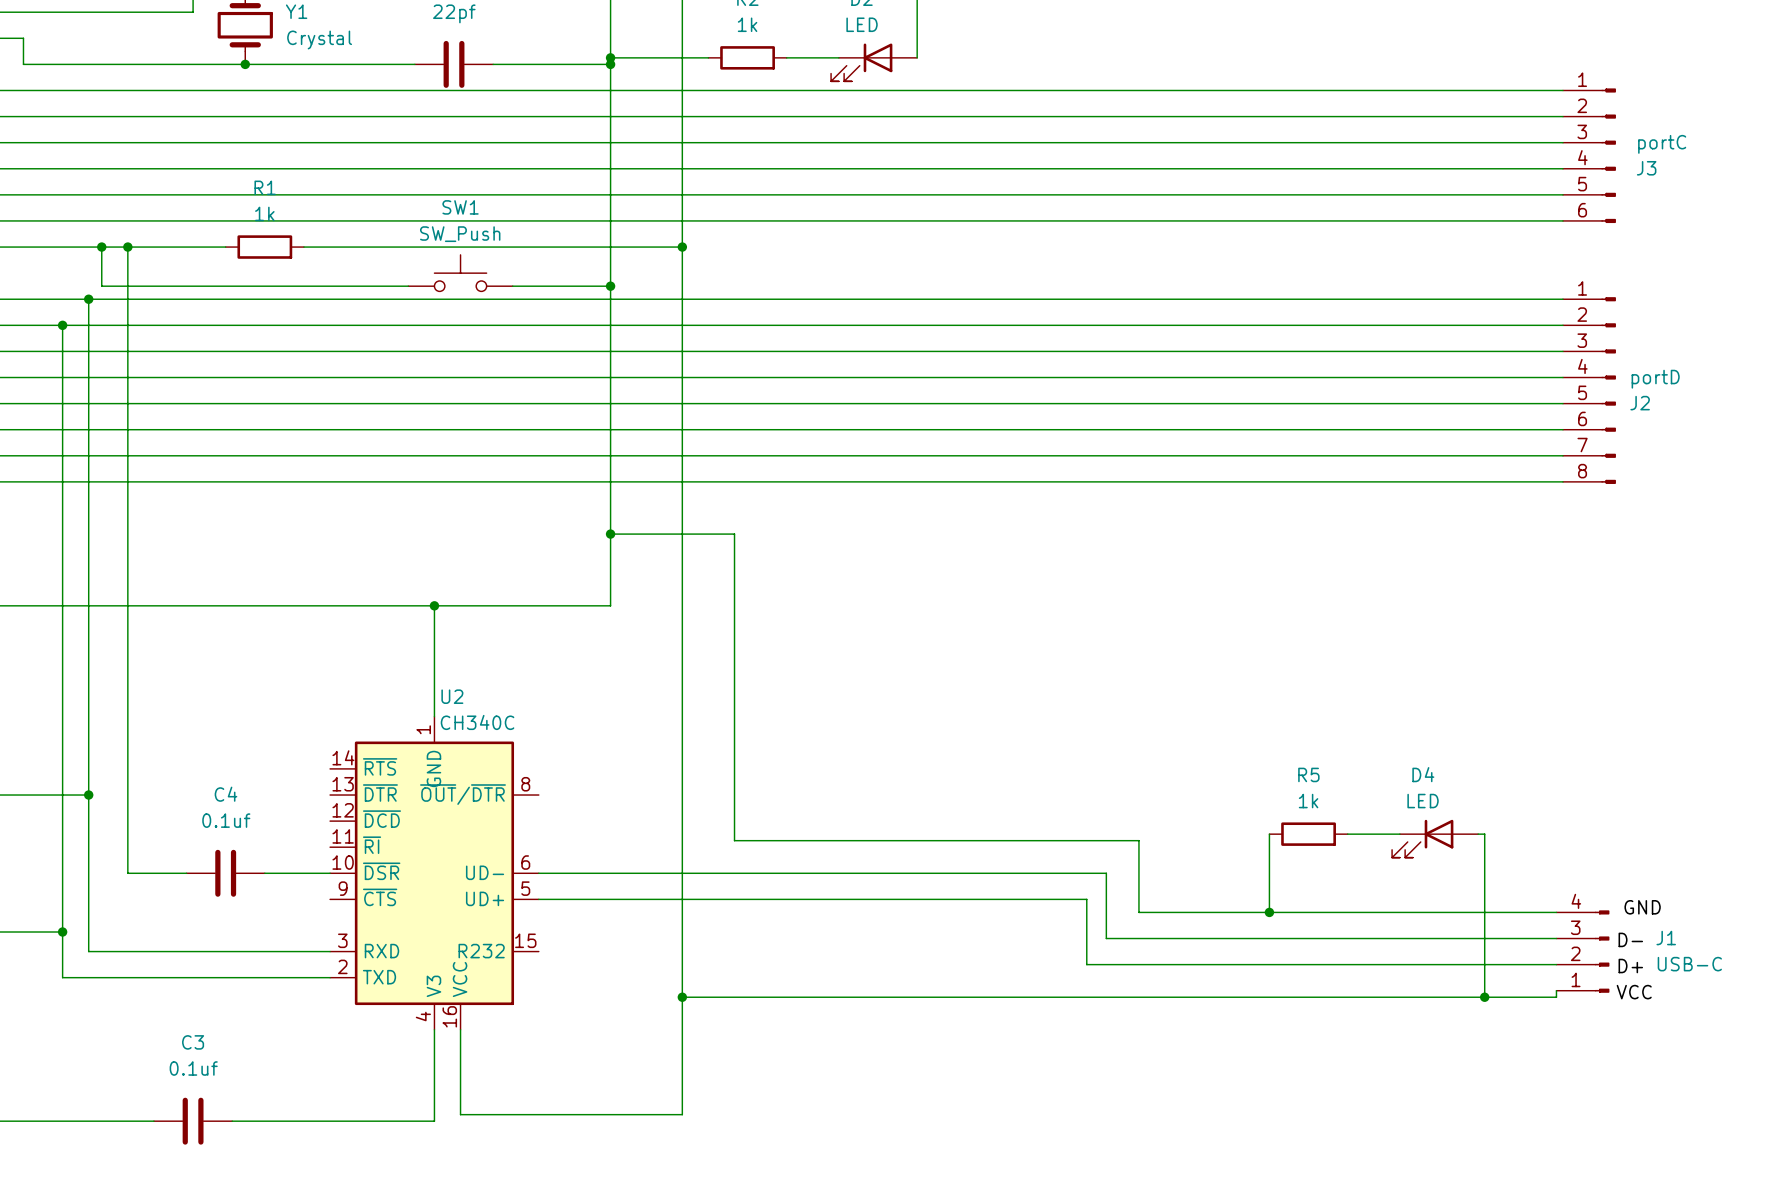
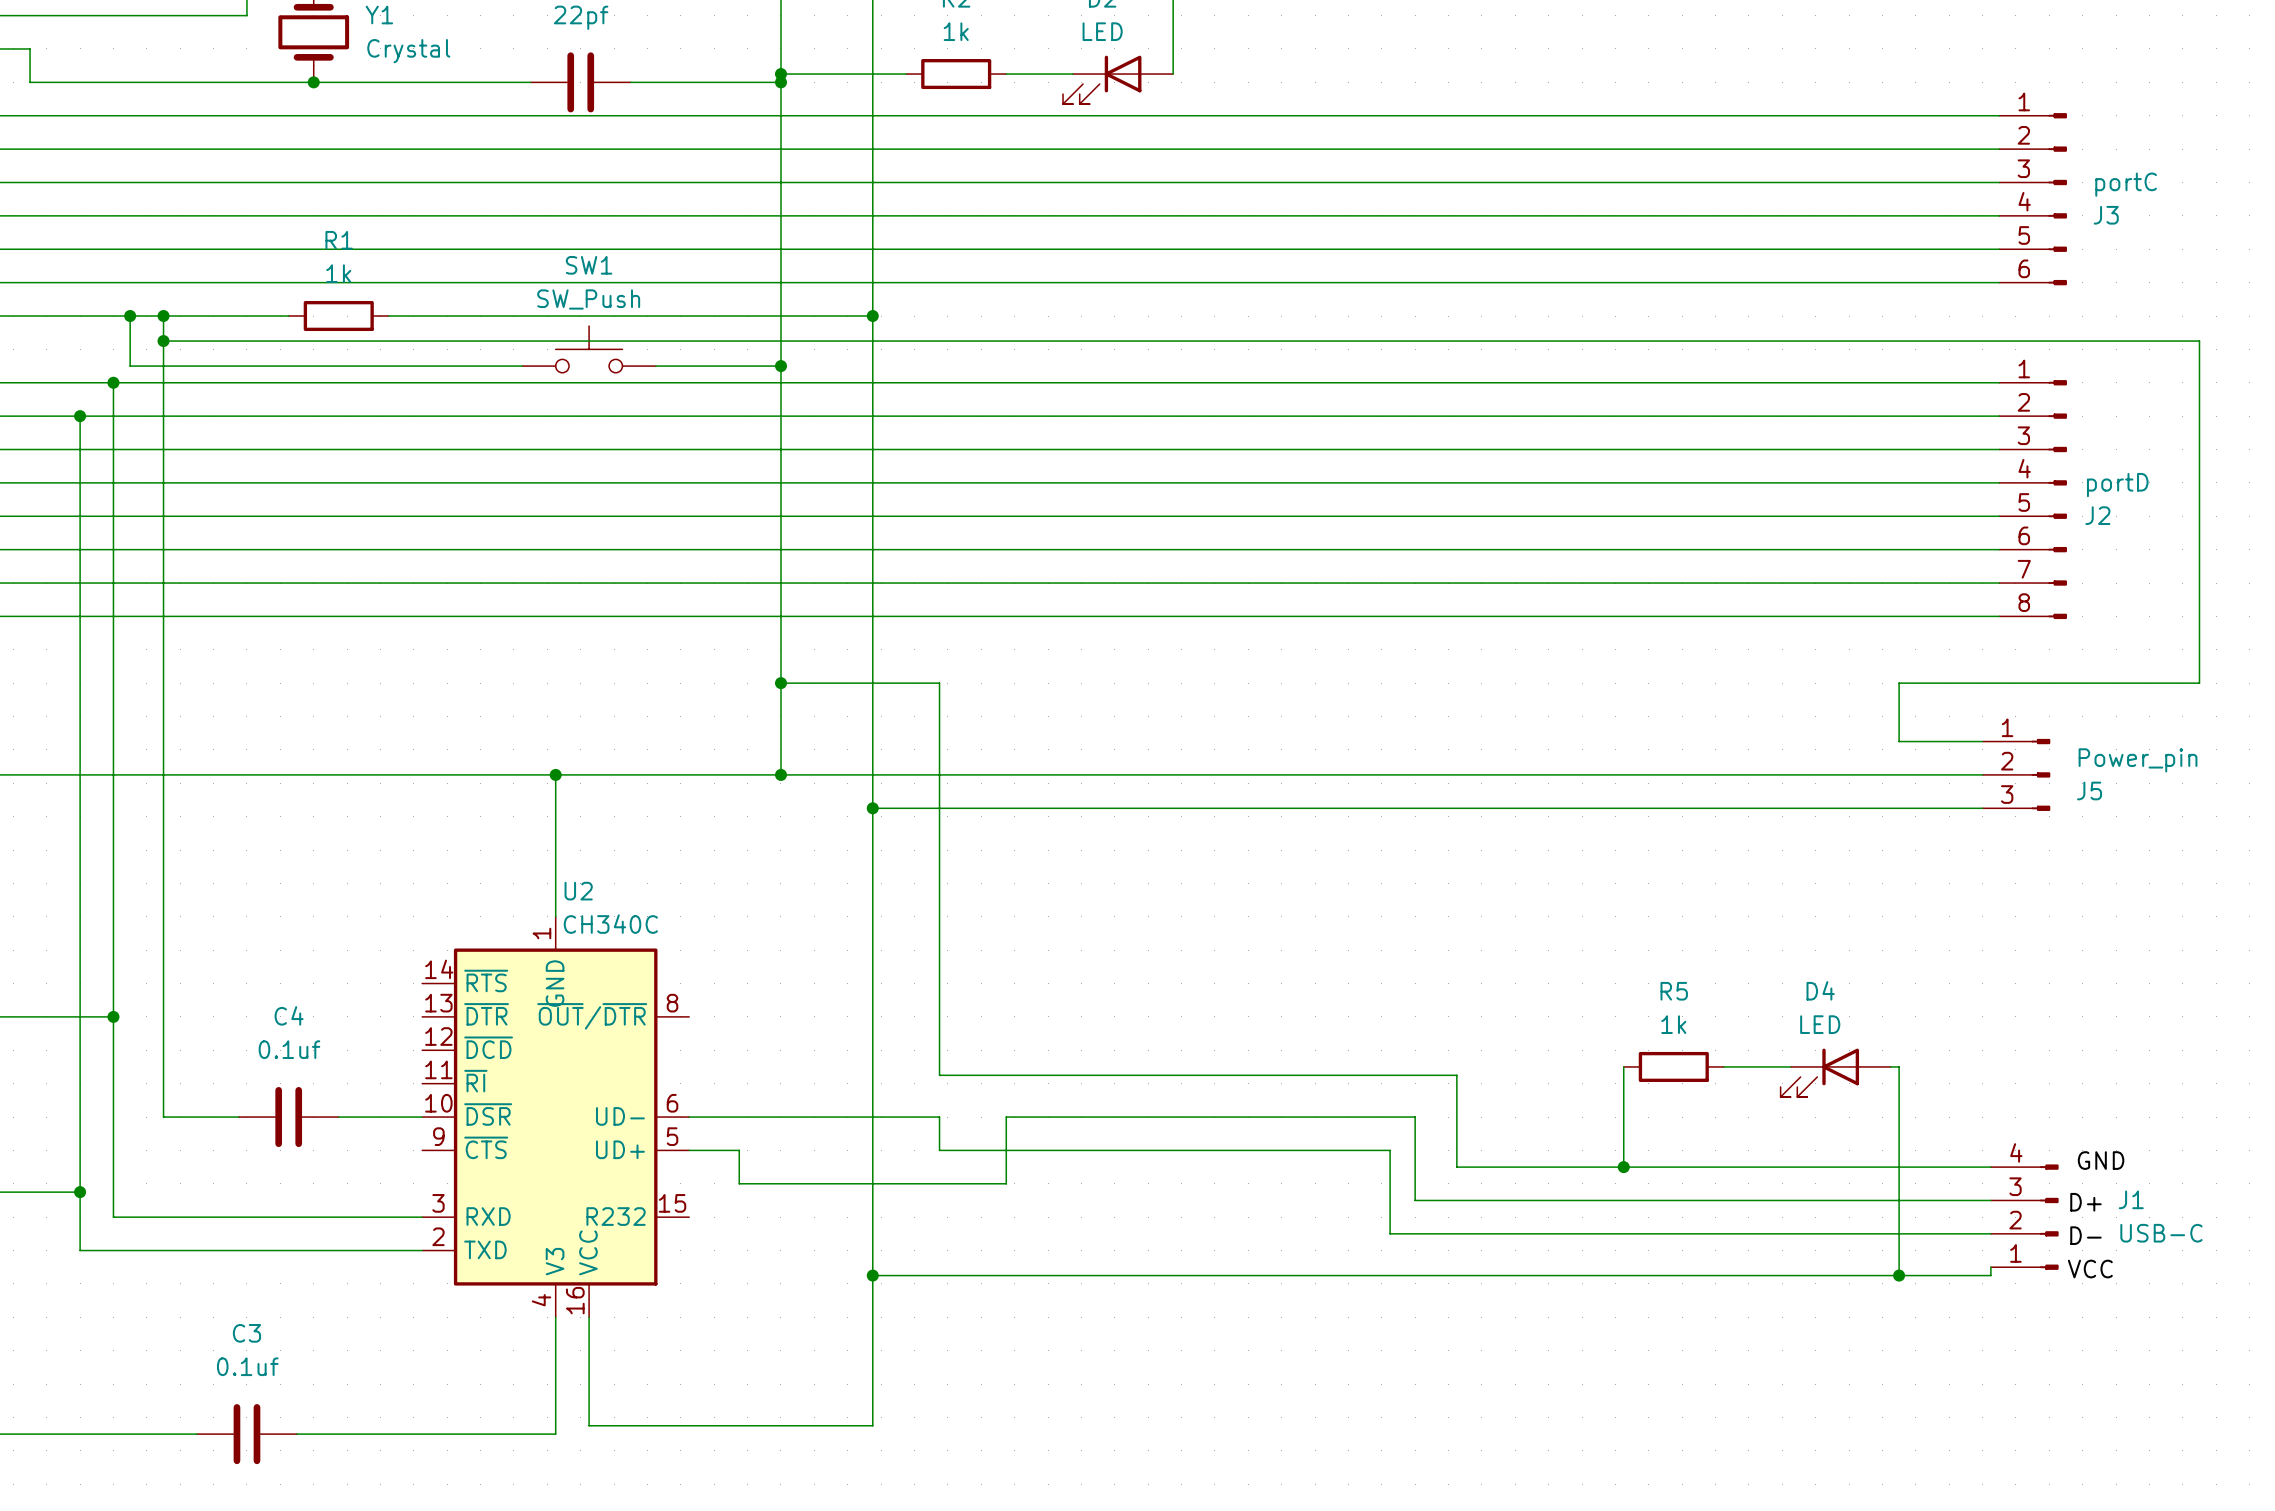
wire: none -> (163, 341) (2199, 341) (2199, 683) (1899, 683) (1899, 741) (1982, 741)
junction: none -> (163, 341)
wire: none -> (780, 774) (1982, 774)
junction: none -> (780, 774)
J5: none -> Power_pin (2016, 774)
wire: none -> (872, 808) (1982, 808)
junction: none -> (872, 808)
wire: (734, 873) (786, 873) -> (939, 1117) (939, 1150)
wire: (577, 899) (734, 899) -> (739, 1150) (739, 1183) (1006, 1183) (1006, 1117)
label: D- (1630, 939) -> D+ (2085, 1202)
label: D+ (1630, 966) -> D- (2085, 1235)

